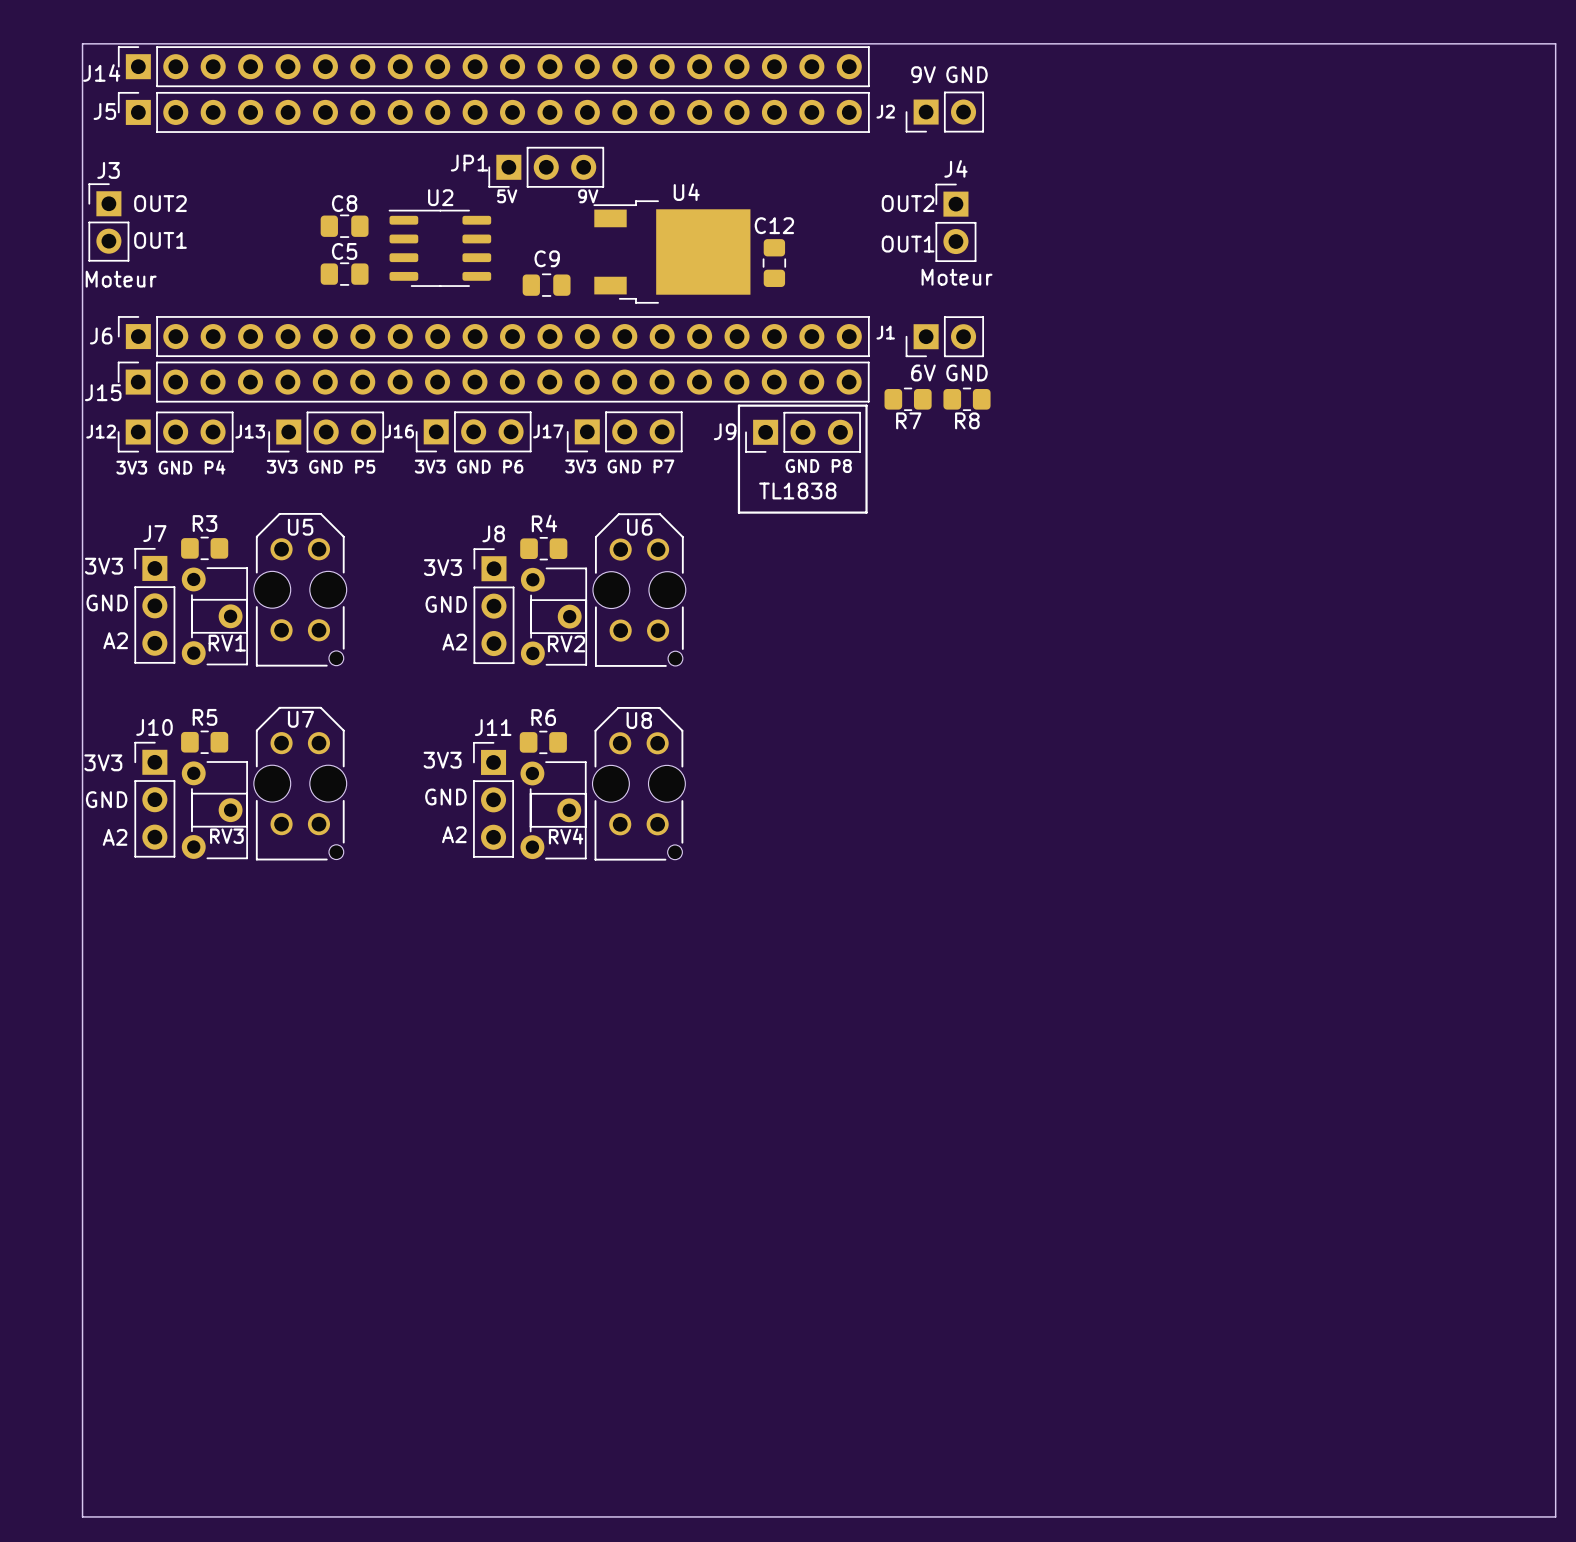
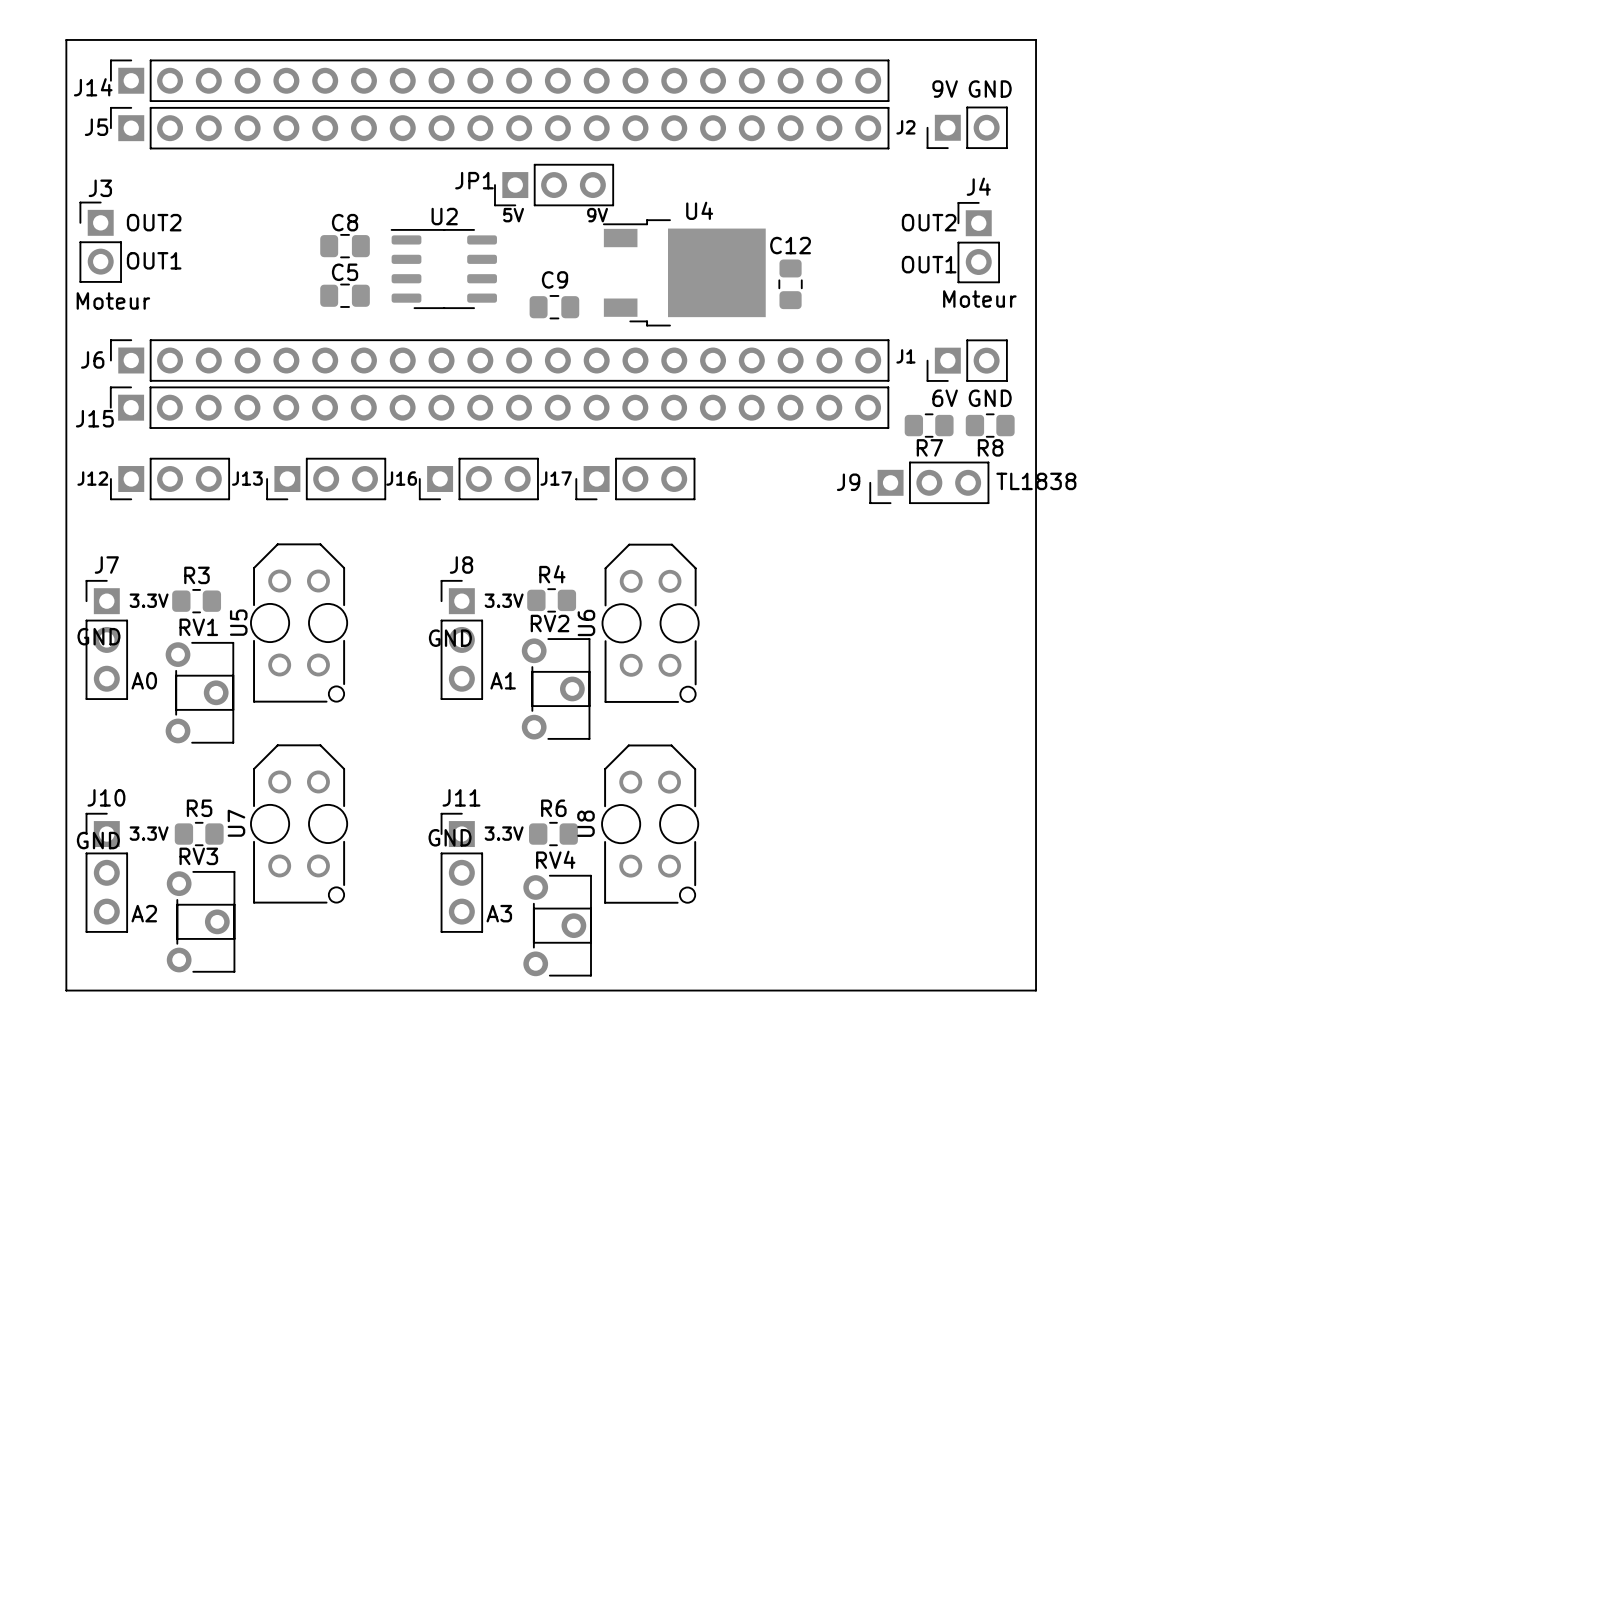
board edge: none -> (66, 39) (1036, 39) (1036, 990) (66, 990) (66, 39)
board edge: (82, 43) (1555, 43) (1555, 1516) (82, 1516) (82, 43) -> none
line: (738, 405) (866, 405) (866, 512) (738, 512) (738, 405) -> none
J16 position: (473, 431) -> (478, 479)
J17 position: (624, 431) -> (635, 479)
J12 position: (175, 432) -> (170, 479)
J13 position: (326, 432) -> (326, 479)
J9 position: (803, 432) -> (929, 482)
text: 3V3 (282, 466) -> none
text: GND (325, 466) -> none
text: P5 (365, 466) -> none
text: 3V3 (430, 466) -> none
text: GND (473, 466) -> none
text: P6 (513, 466) -> none
text: 3V3 (580, 466) -> none
text: GND (624, 466) -> none
text: P7 (663, 466) -> none
text: GND (802, 466) -> none
text: P8 (841, 466) -> none
text: 3V3 (131, 467) -> none
text: GND (175, 467) -> none
text: P4 (215, 467) -> none
text position: TL1838 (797, 490) -> TL1838 (1036, 481)
U5 name rotation: 0° (300, 527) -> 90° counterclockwise (238, 622)
U5 name position: U5 (300, 527) -> U5 (238, 622)
U6 name rotation: 0° (639, 527) -> 90° counterclockwise (586, 622)
U6 name position: U6 (639, 527) -> U6 (586, 622)
R3 position: (204, 548) -> (196, 601)
R4 position: (543, 548) -> (551, 600)
text: 3V3 (103, 566) -> none
text: 3V3 (442, 567) -> none
text: none -> 3.3V (149, 600)
text: none -> 3.3V (504, 600)
J7 position: (154, 605) -> (106, 639)
J8 position: (493, 606) -> (461, 639)
RV1 position: (214, 616) -> (199, 692)
RV2 position: (554, 616) -> (556, 688)
text: A2 (115, 640) -> none
text: A2 (454, 642) -> none
RV1 name position: RV1 (227, 643) -> RV1 (198, 627)
RV2 name position: RV2 (566, 643) -> RV2 (550, 623)
text: none -> A0 (144, 680)
text: none -> A1 (503, 680)
U7 name rotation: 0° (300, 719) -> 90° counterclockwise (236, 823)
U7 name position: U7 (300, 719) -> U7 (236, 823)
U8 name rotation: 0° (639, 720) -> 90° counterclockwise (585, 823)
U8 name position: U8 (639, 720) -> U8 (585, 823)
R5 position: (204, 742) -> (199, 834)
R6 position: (543, 742) -> (553, 834)
text: 3V3 (442, 760) -> none
text: 3V3 (103, 762) -> none
text: none -> 3.3V (149, 833)
text: none -> 3.3V (504, 833)
J10 position: (154, 799) -> (106, 872)
J11 position: (493, 799) -> (461, 872)
RV3 position: (214, 810) -> (201, 921)
RV4 position: (553, 810) -> (557, 925)
text: A2 (454, 834) -> none
RV3 name position: RV3 (226, 836) -> RV3 (198, 856)
RV4 name position: RV4 (566, 836) -> RV4 (555, 859)
text position: A2 (115, 837) -> A2 (144, 913)
text: none -> A3 (499, 913)

